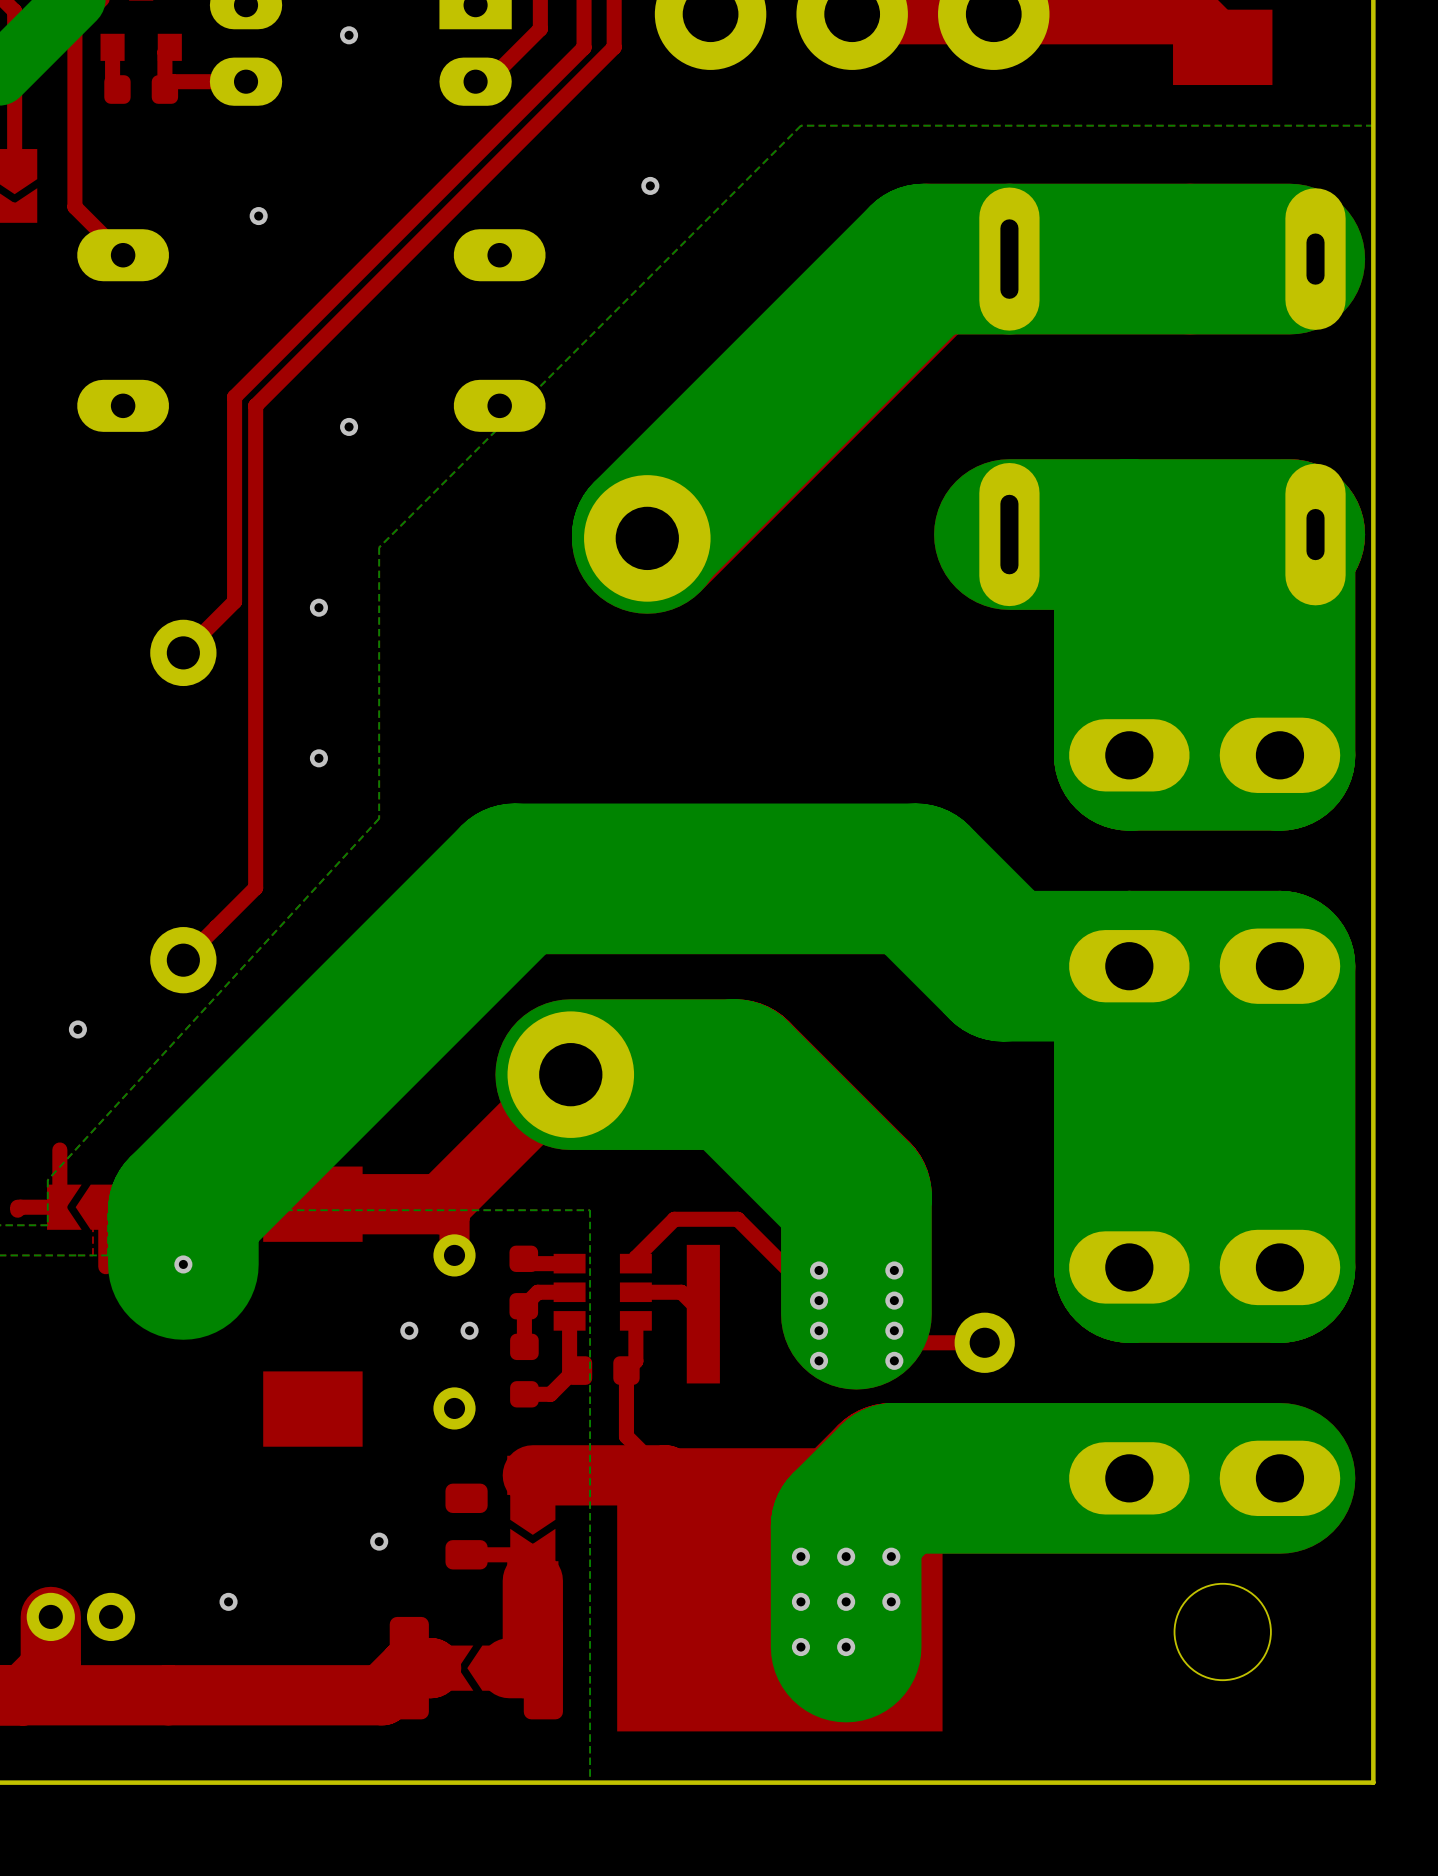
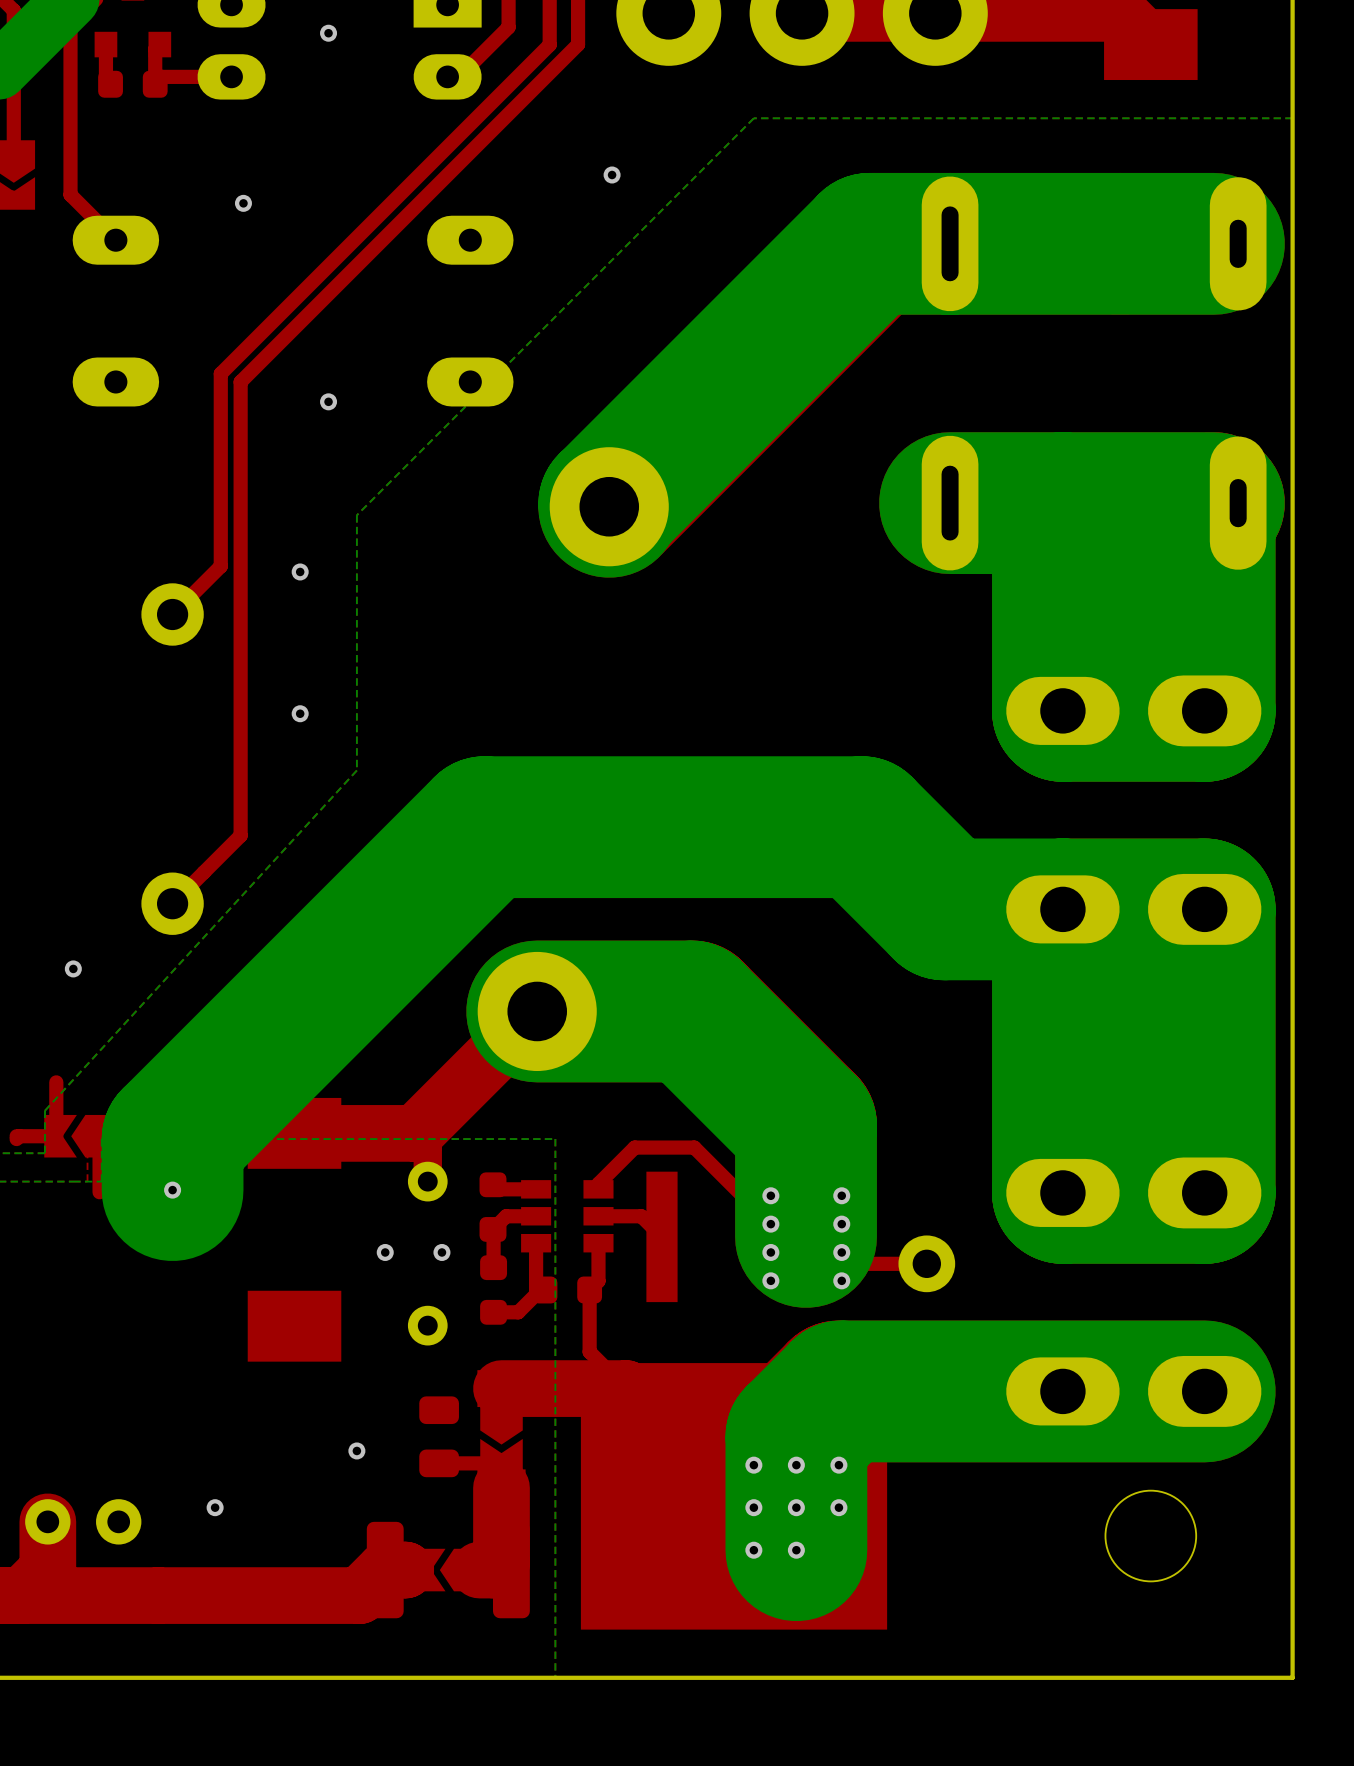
part footprint: [26, 1592, 136, 1642] -> [25, 1499, 142, 1545]

